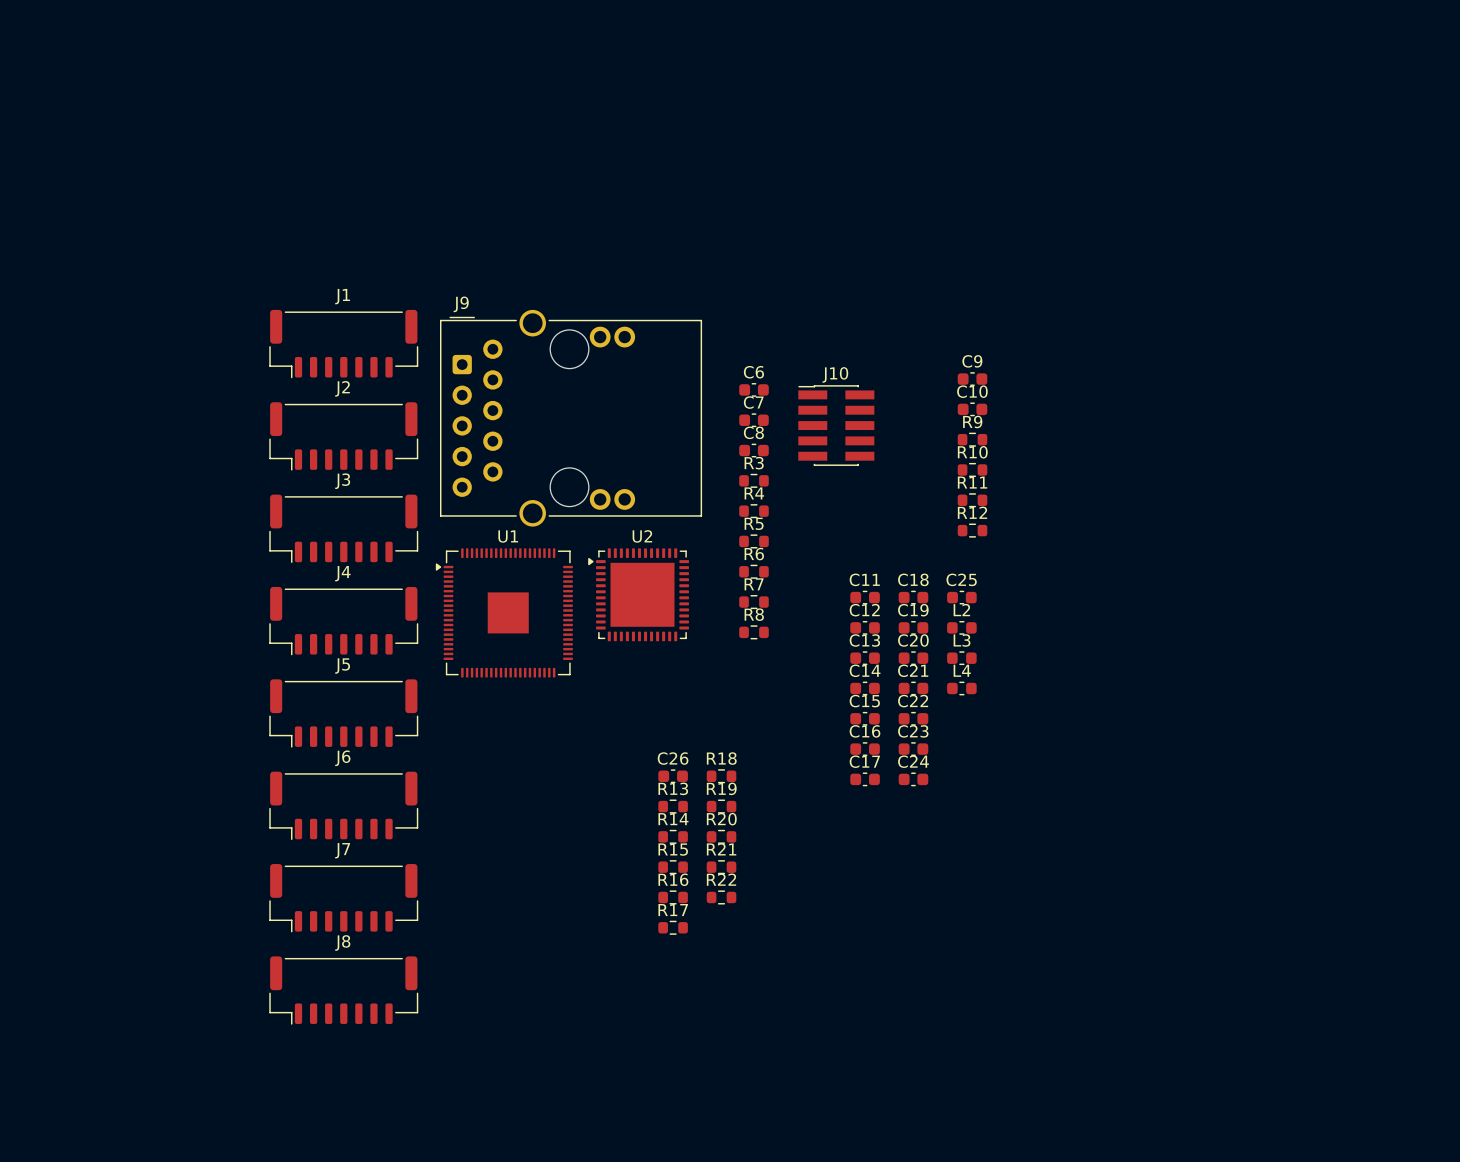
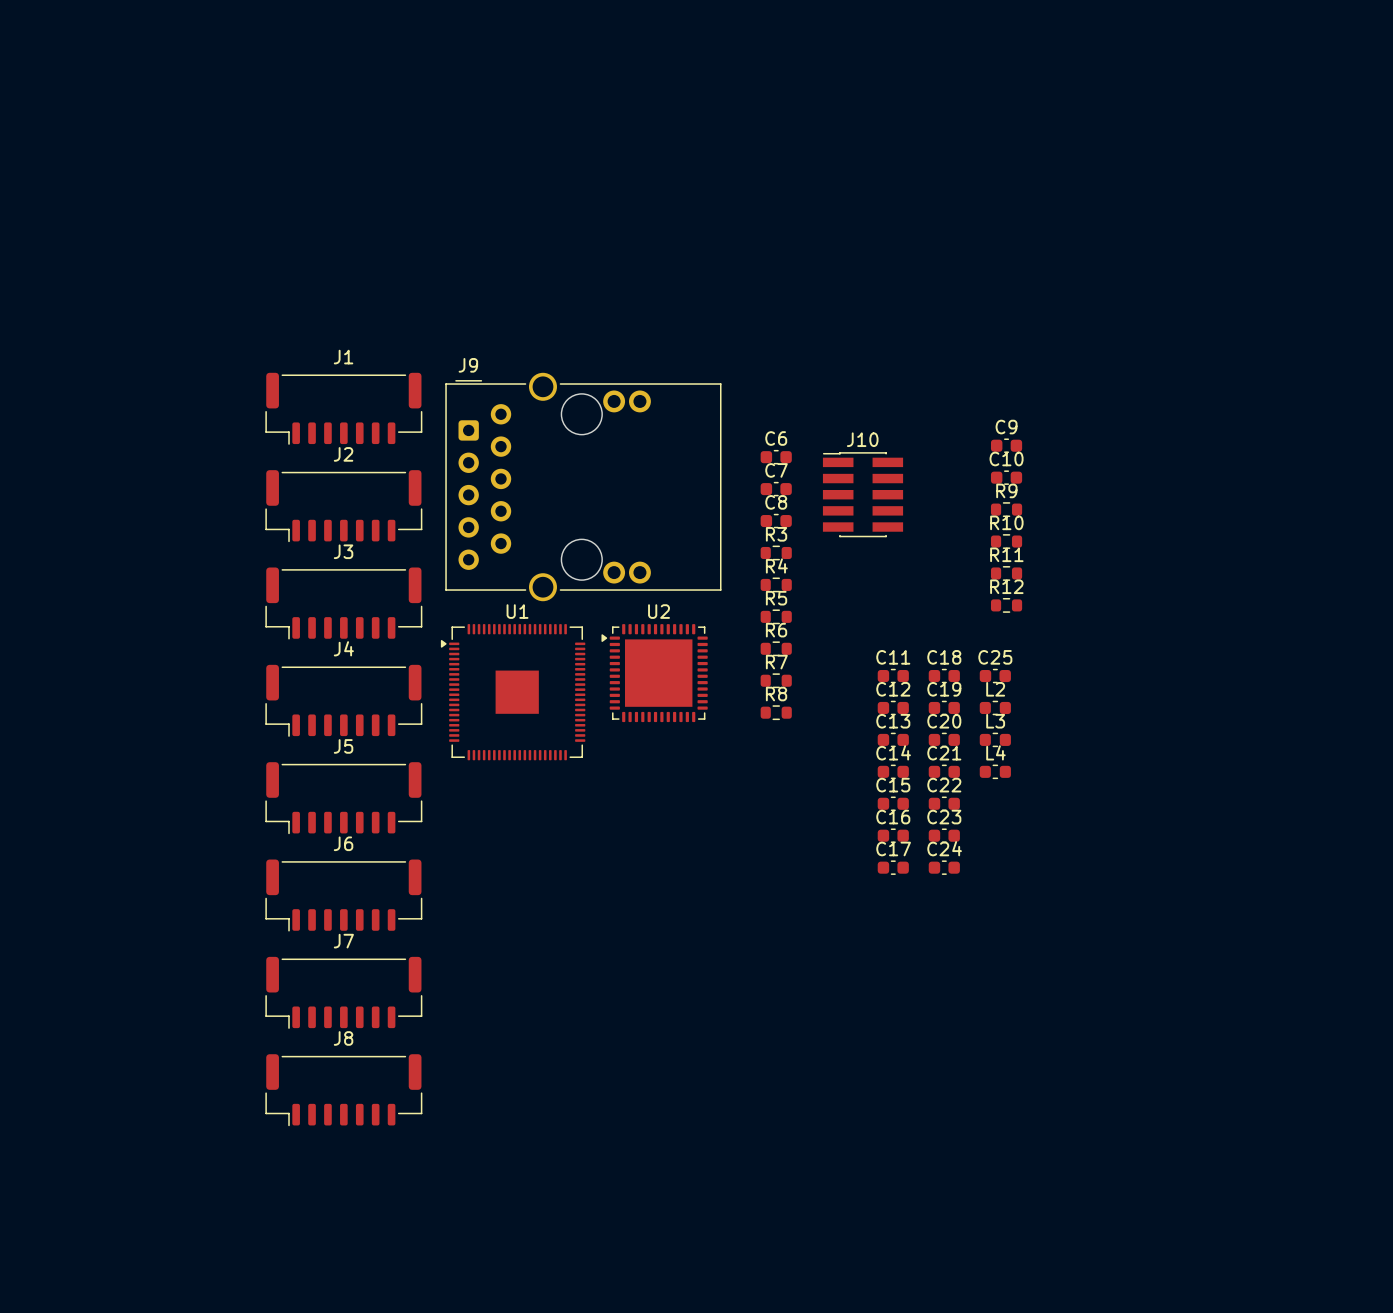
C26: (673, 776) -> none
R18: (721, 776) -> none
R13: (673, 806) -> none
R19: (721, 806) -> none
R14: (673, 836) -> none
R20: (721, 836) -> none
R15: (673, 867) -> none
R21: (721, 867) -> none
R16: (673, 897) -> none
R22: (721, 897) -> none
R17: (673, 927) -> none

